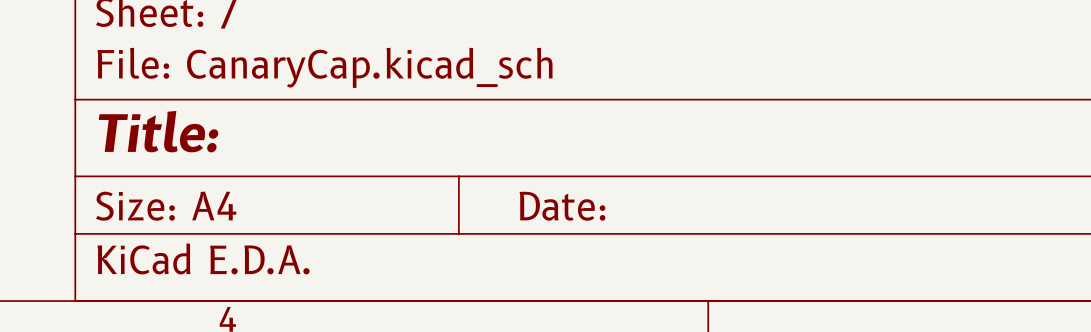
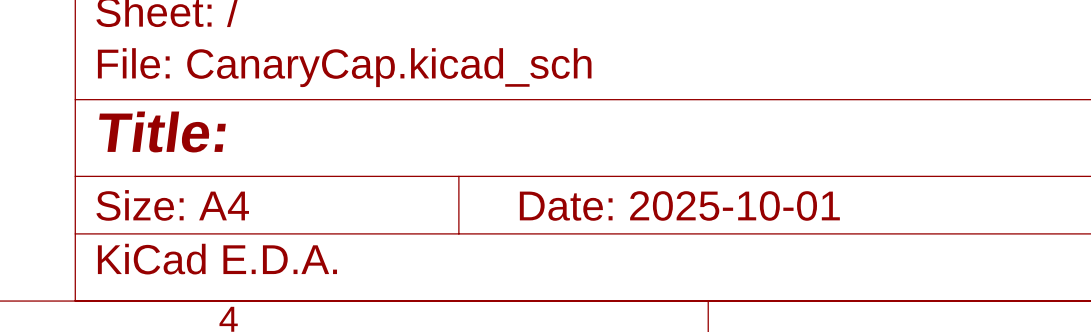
title block: Date: (562, 206) -> Date: 2025-10-01 (679, 205)

